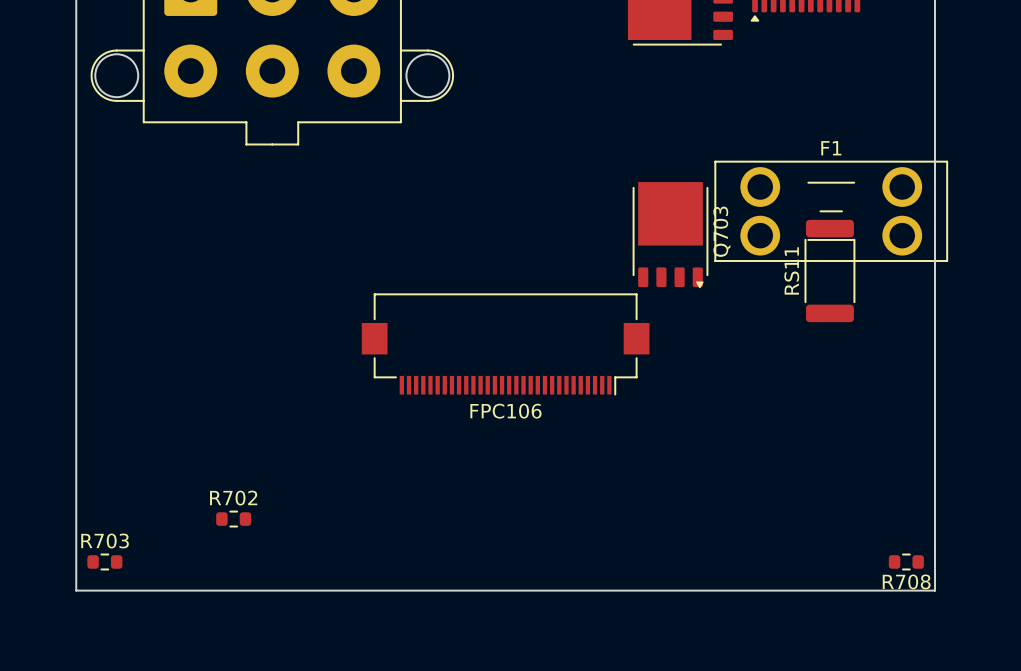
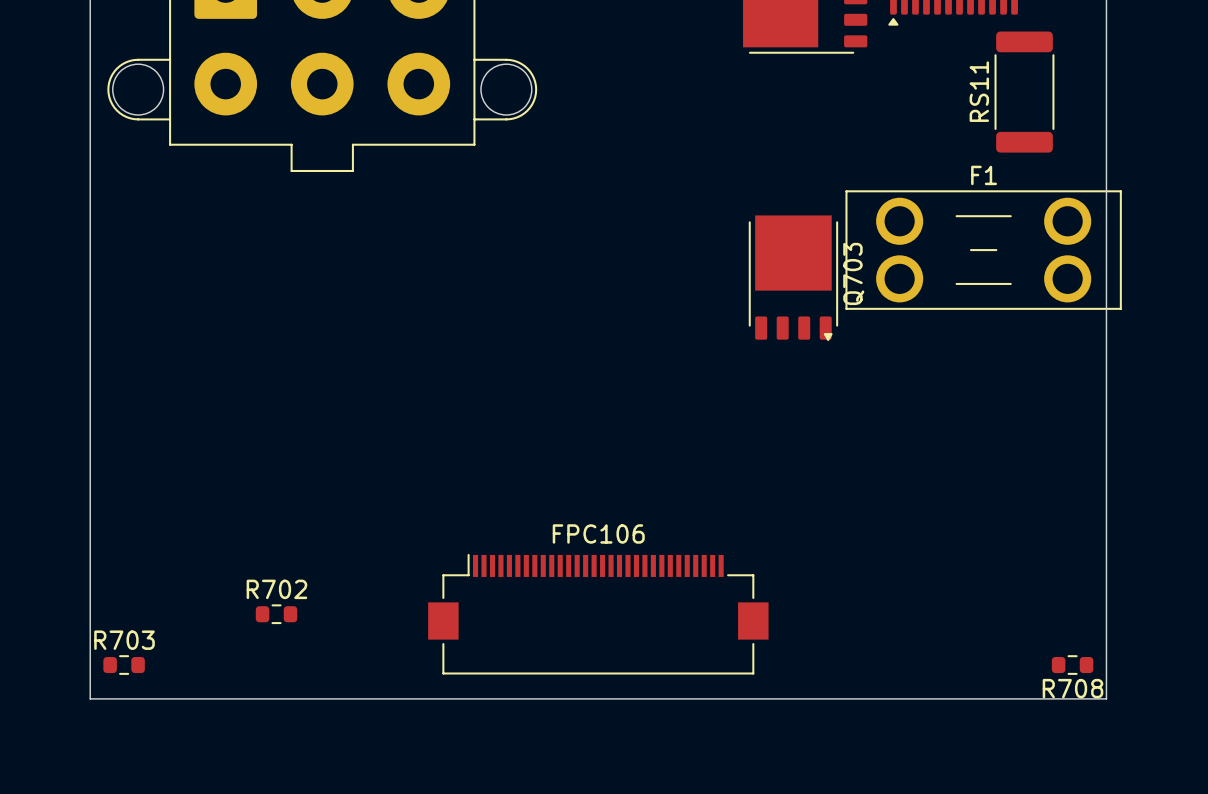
RS11 position: (829, 271) -> (1024, 92)
FPC106 rotation: 0° (505, 344) -> 180° (598, 614)
FPC106 position: (505, 344) -> (598, 614)

